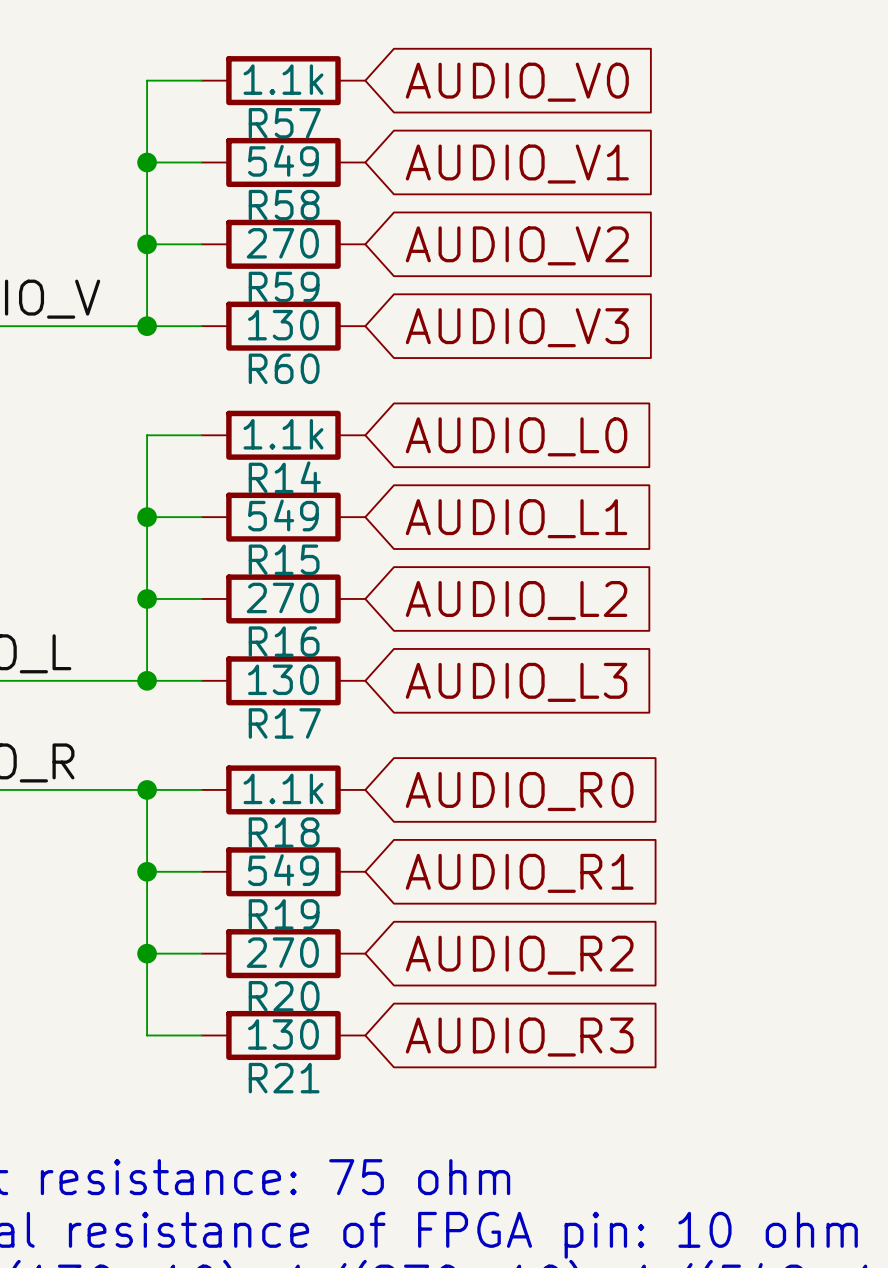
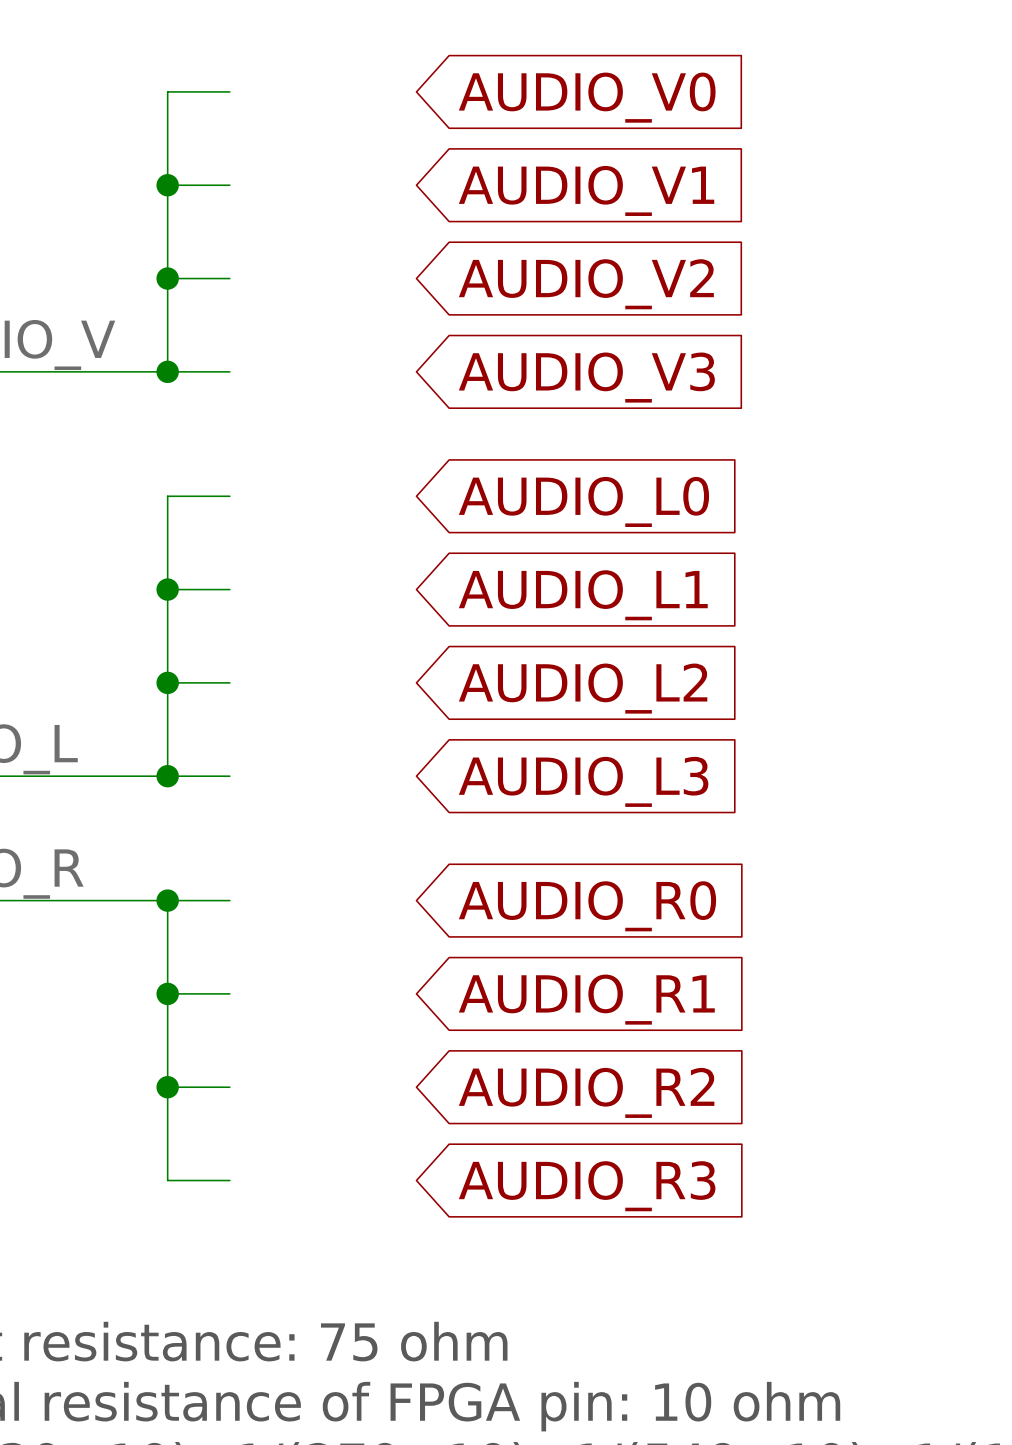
R57: 1.1k (283, 80) -> none
R58: 549 (283, 162) -> none
R59: 270 (283, 244) -> none
R60: 130 (283, 326) -> none
R14: 1.1k (283, 435) -> none
R15: 549 (283, 517) -> none
R16: 270 (283, 598) -> none
R17: 130 (283, 680) -> none
R18: 1.1k (283, 789) -> none
R19: 549 (283, 871) -> none
R20: 270 (283, 953) -> none
R21: 130 (283, 1035) -> none

